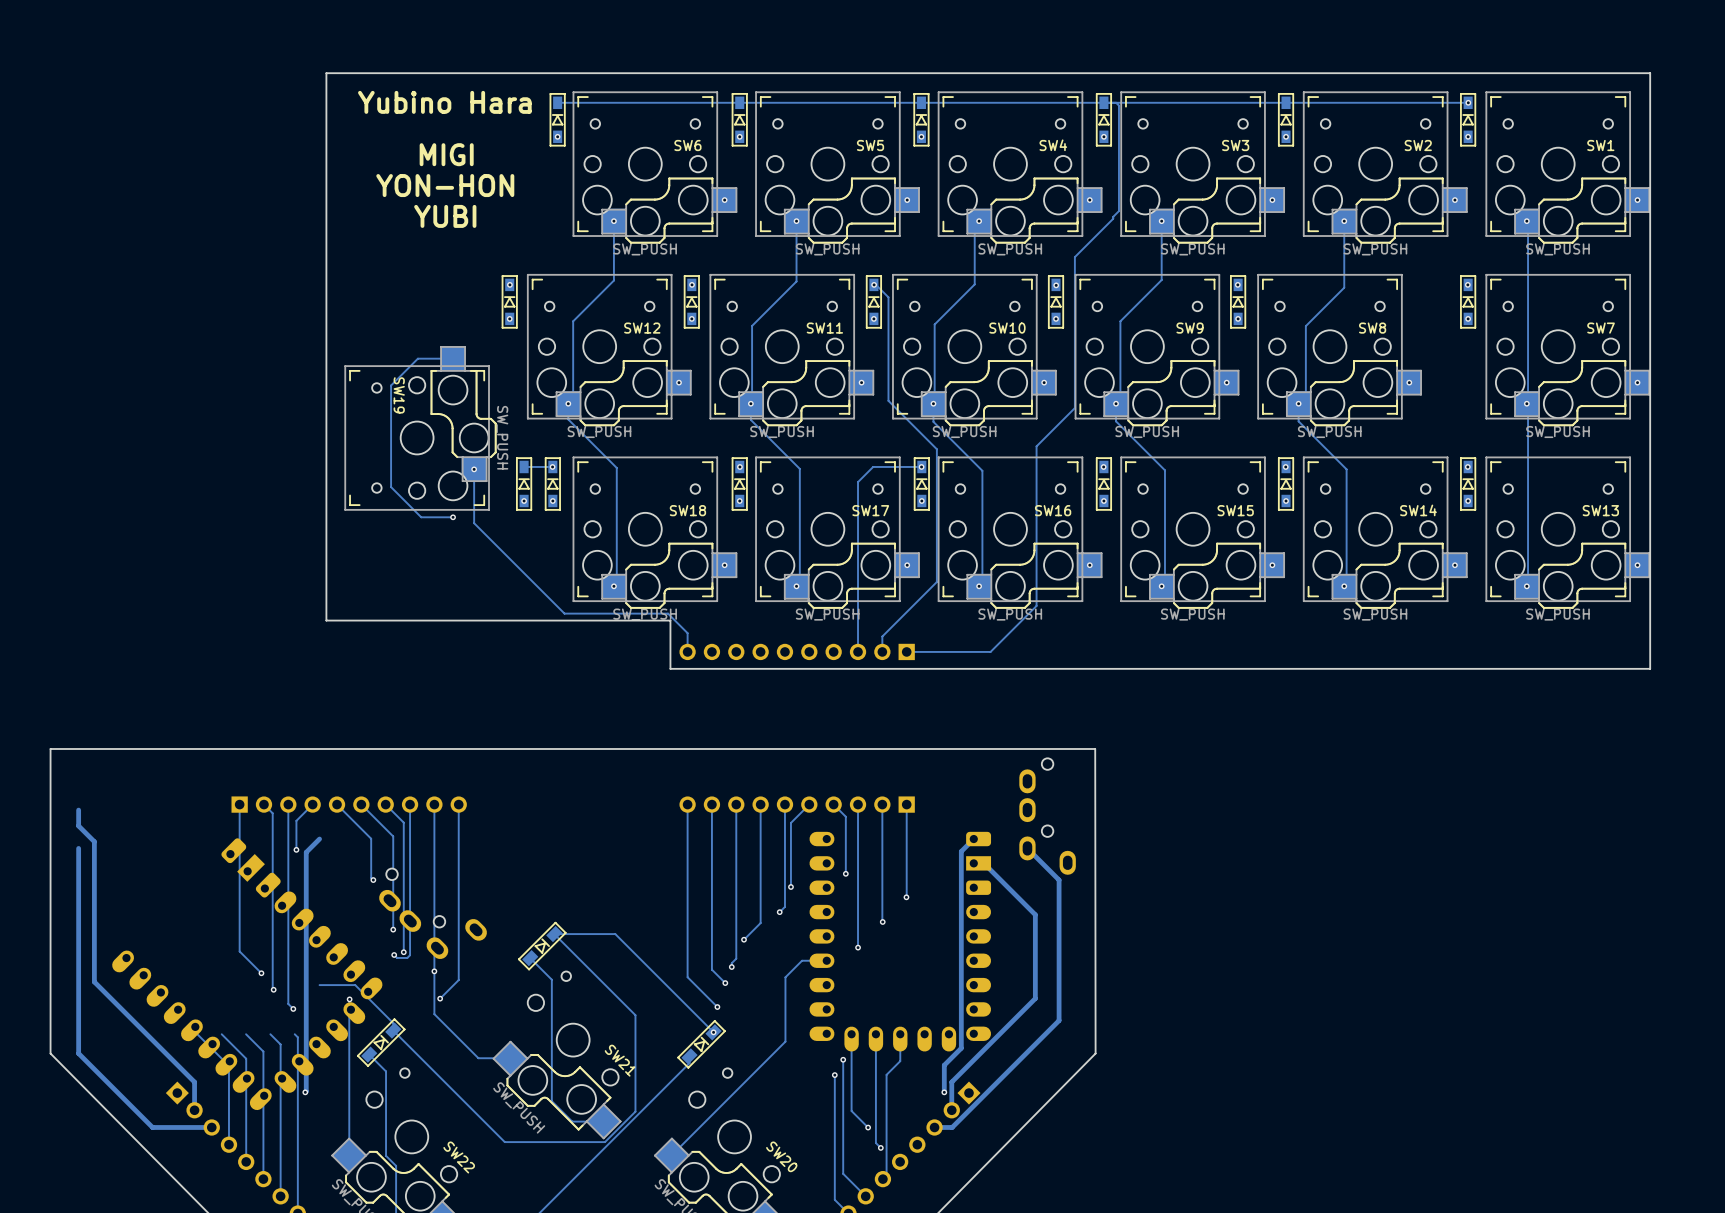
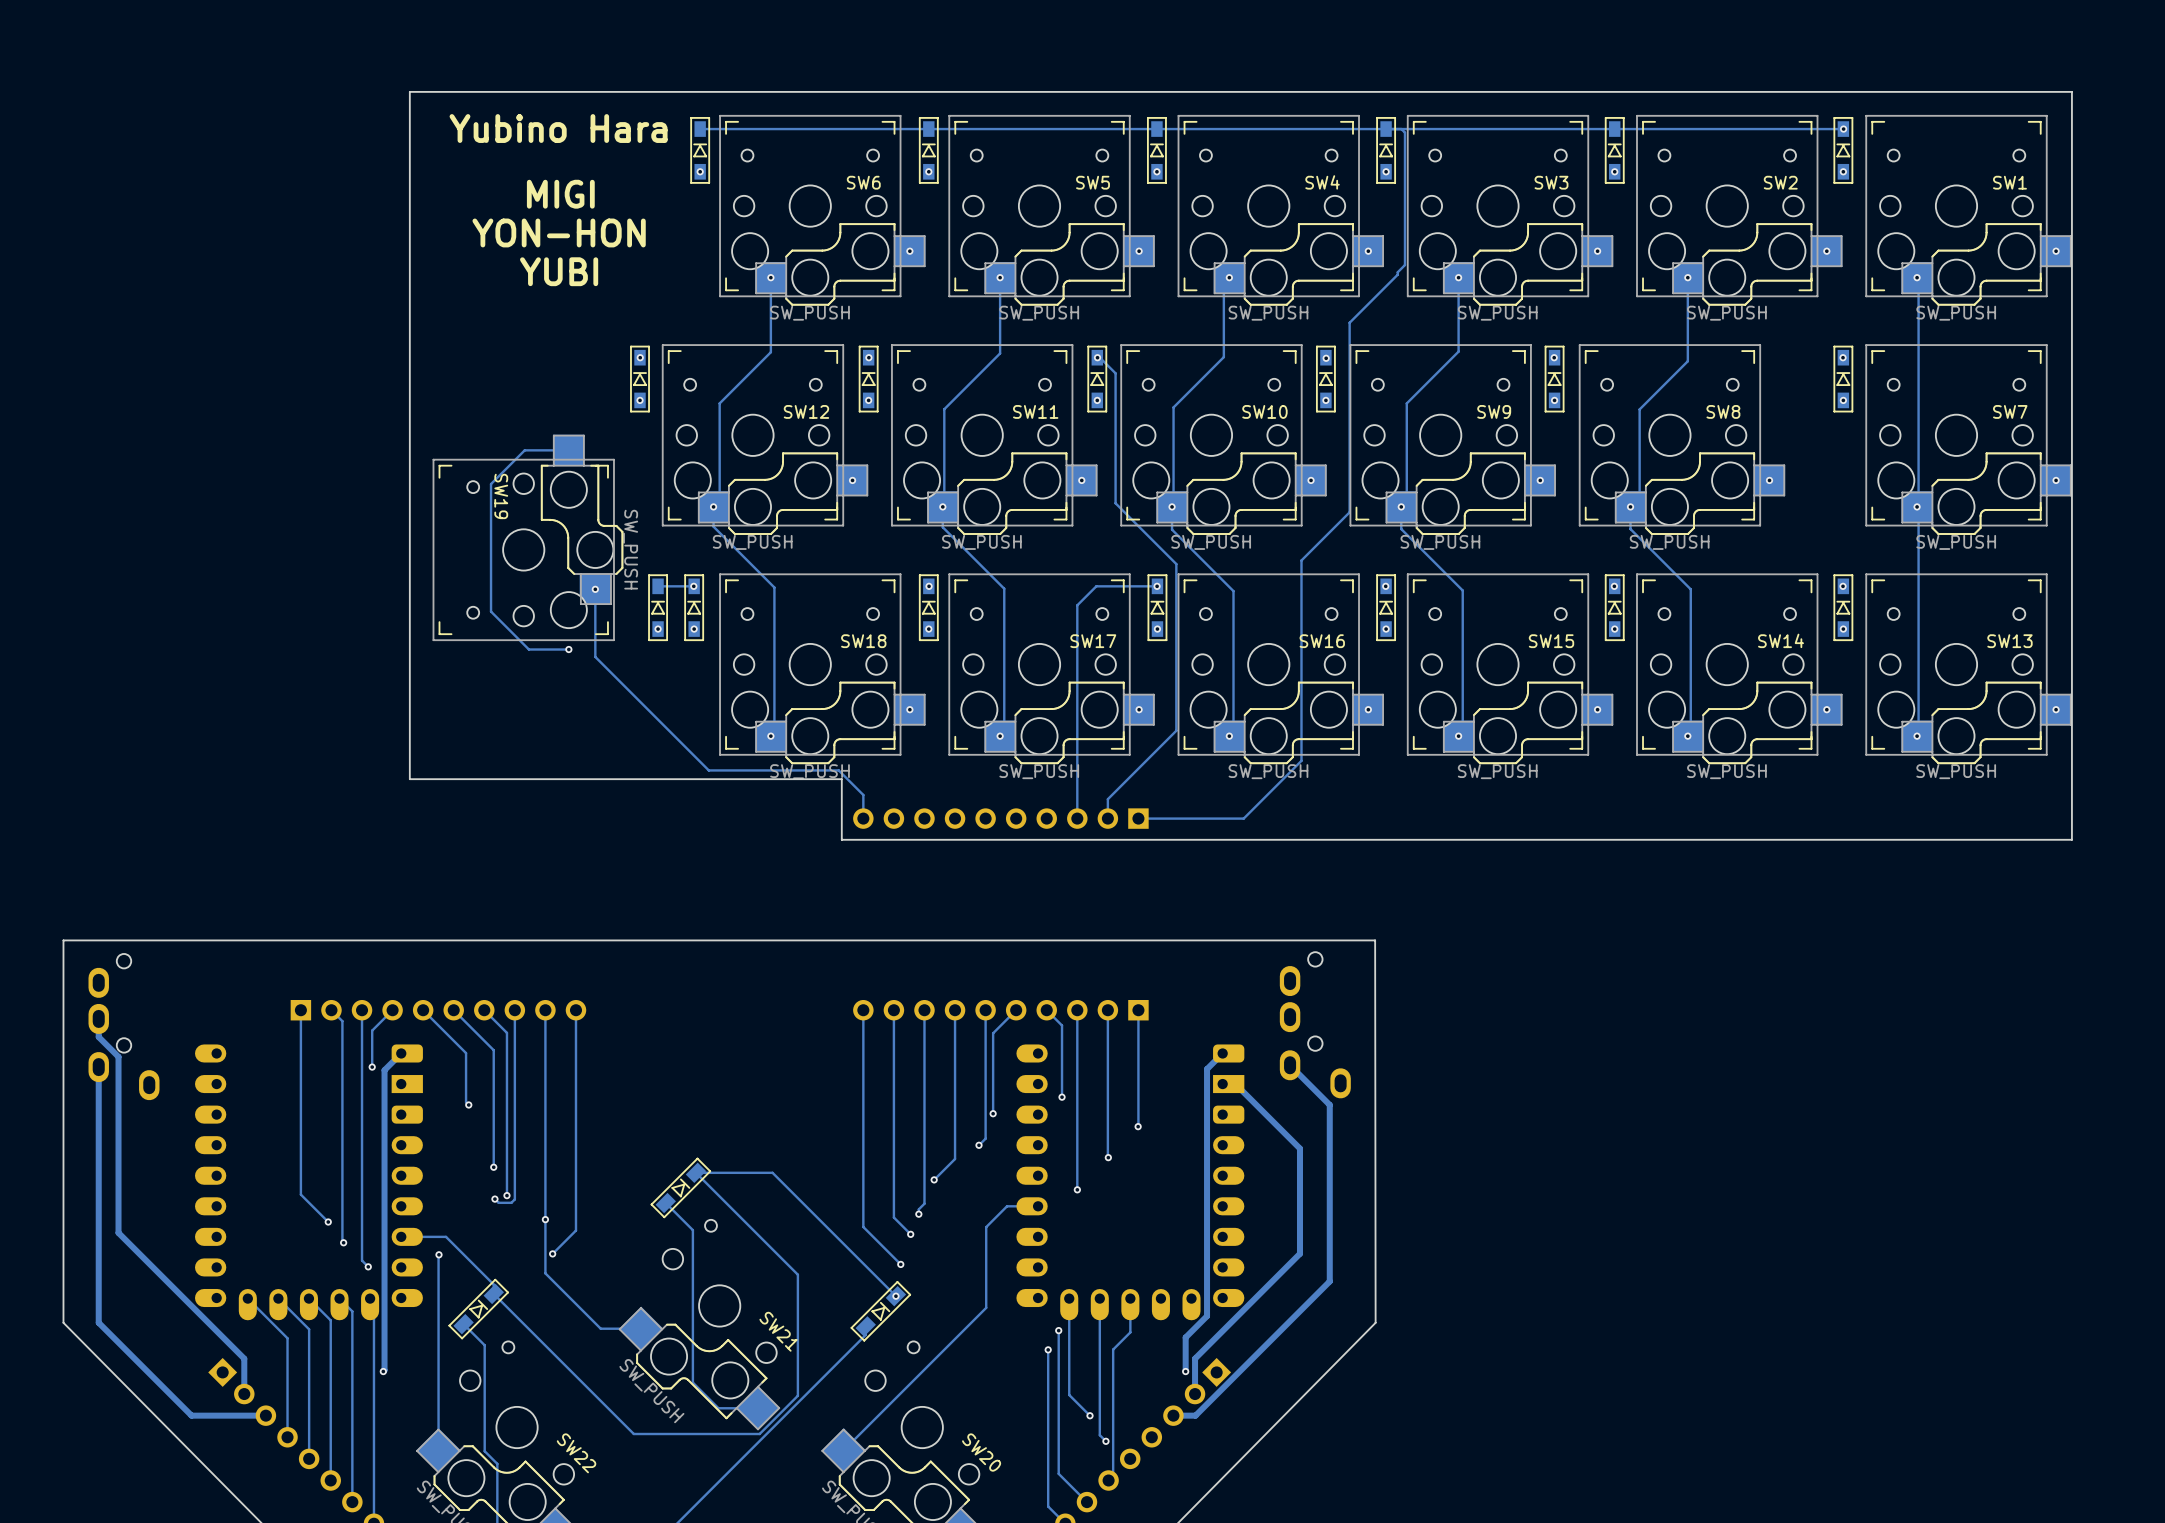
part: none -> (124, 1027)
part: (433, 913) -> none
part: none -> (308, 1182)
part: (247, 974) -> none

